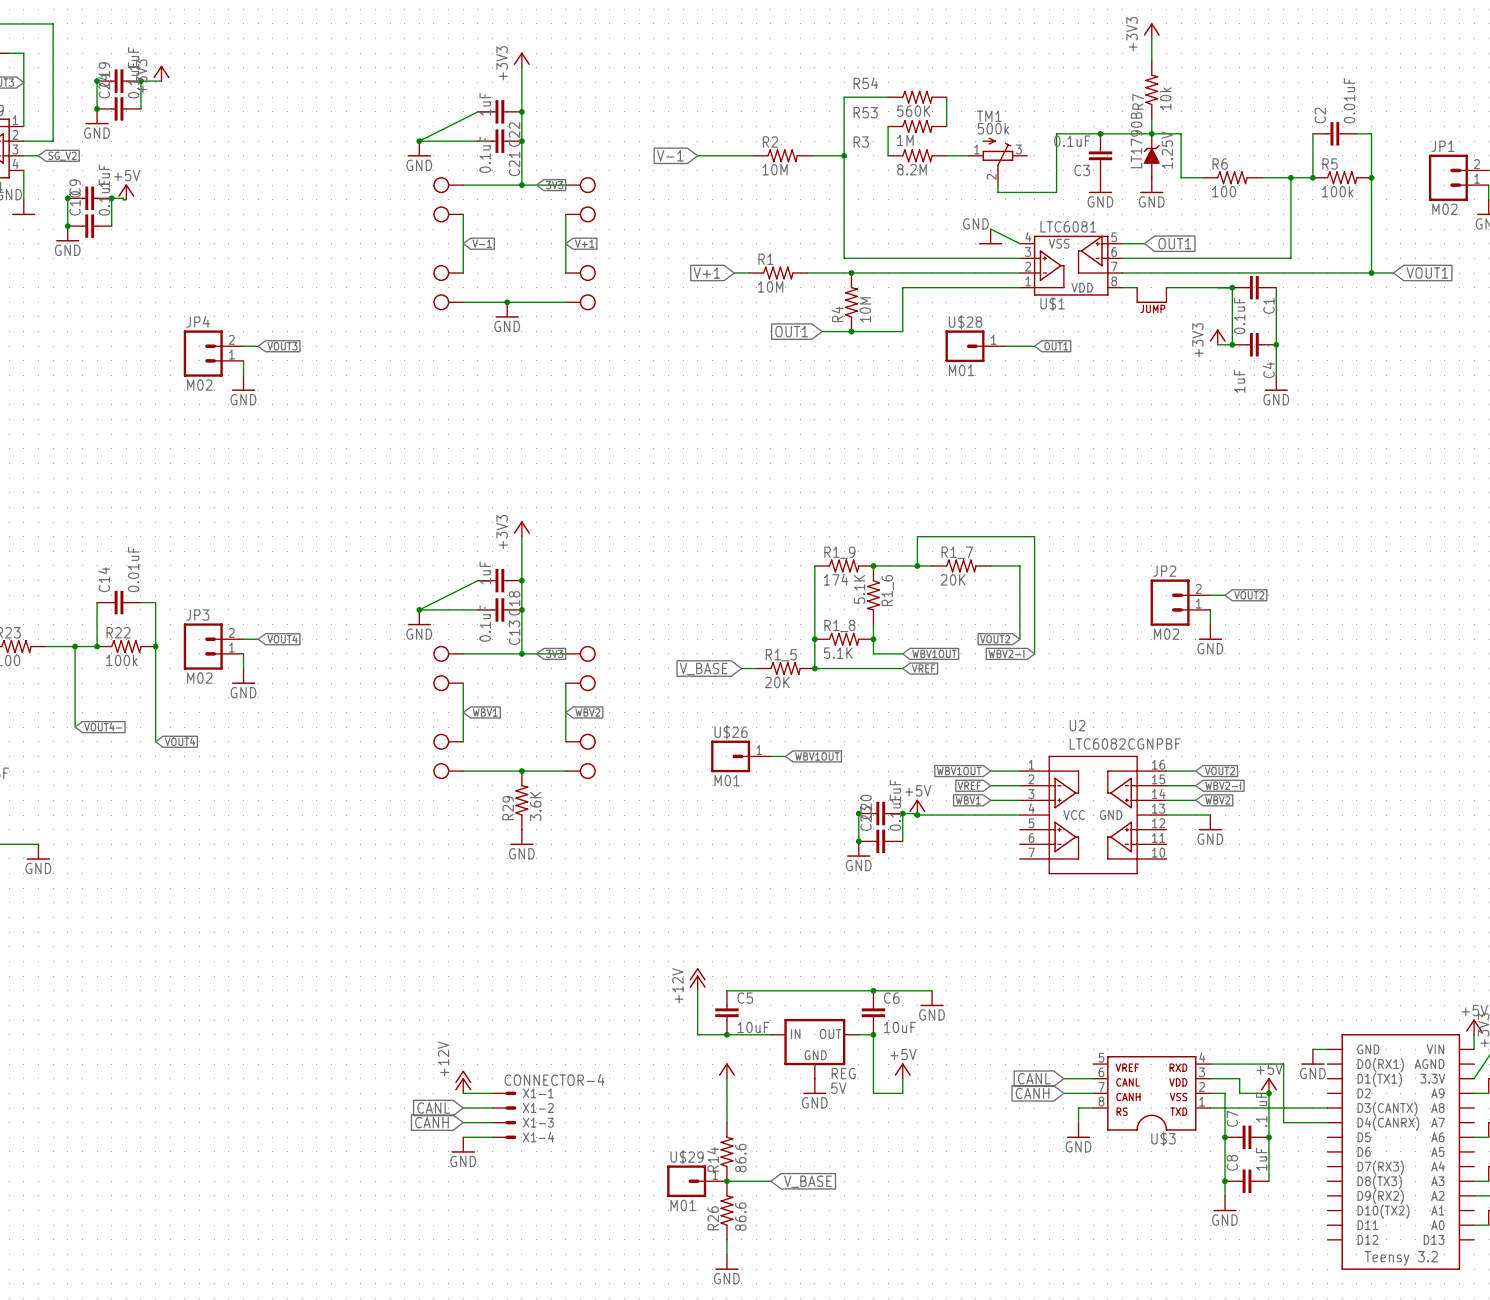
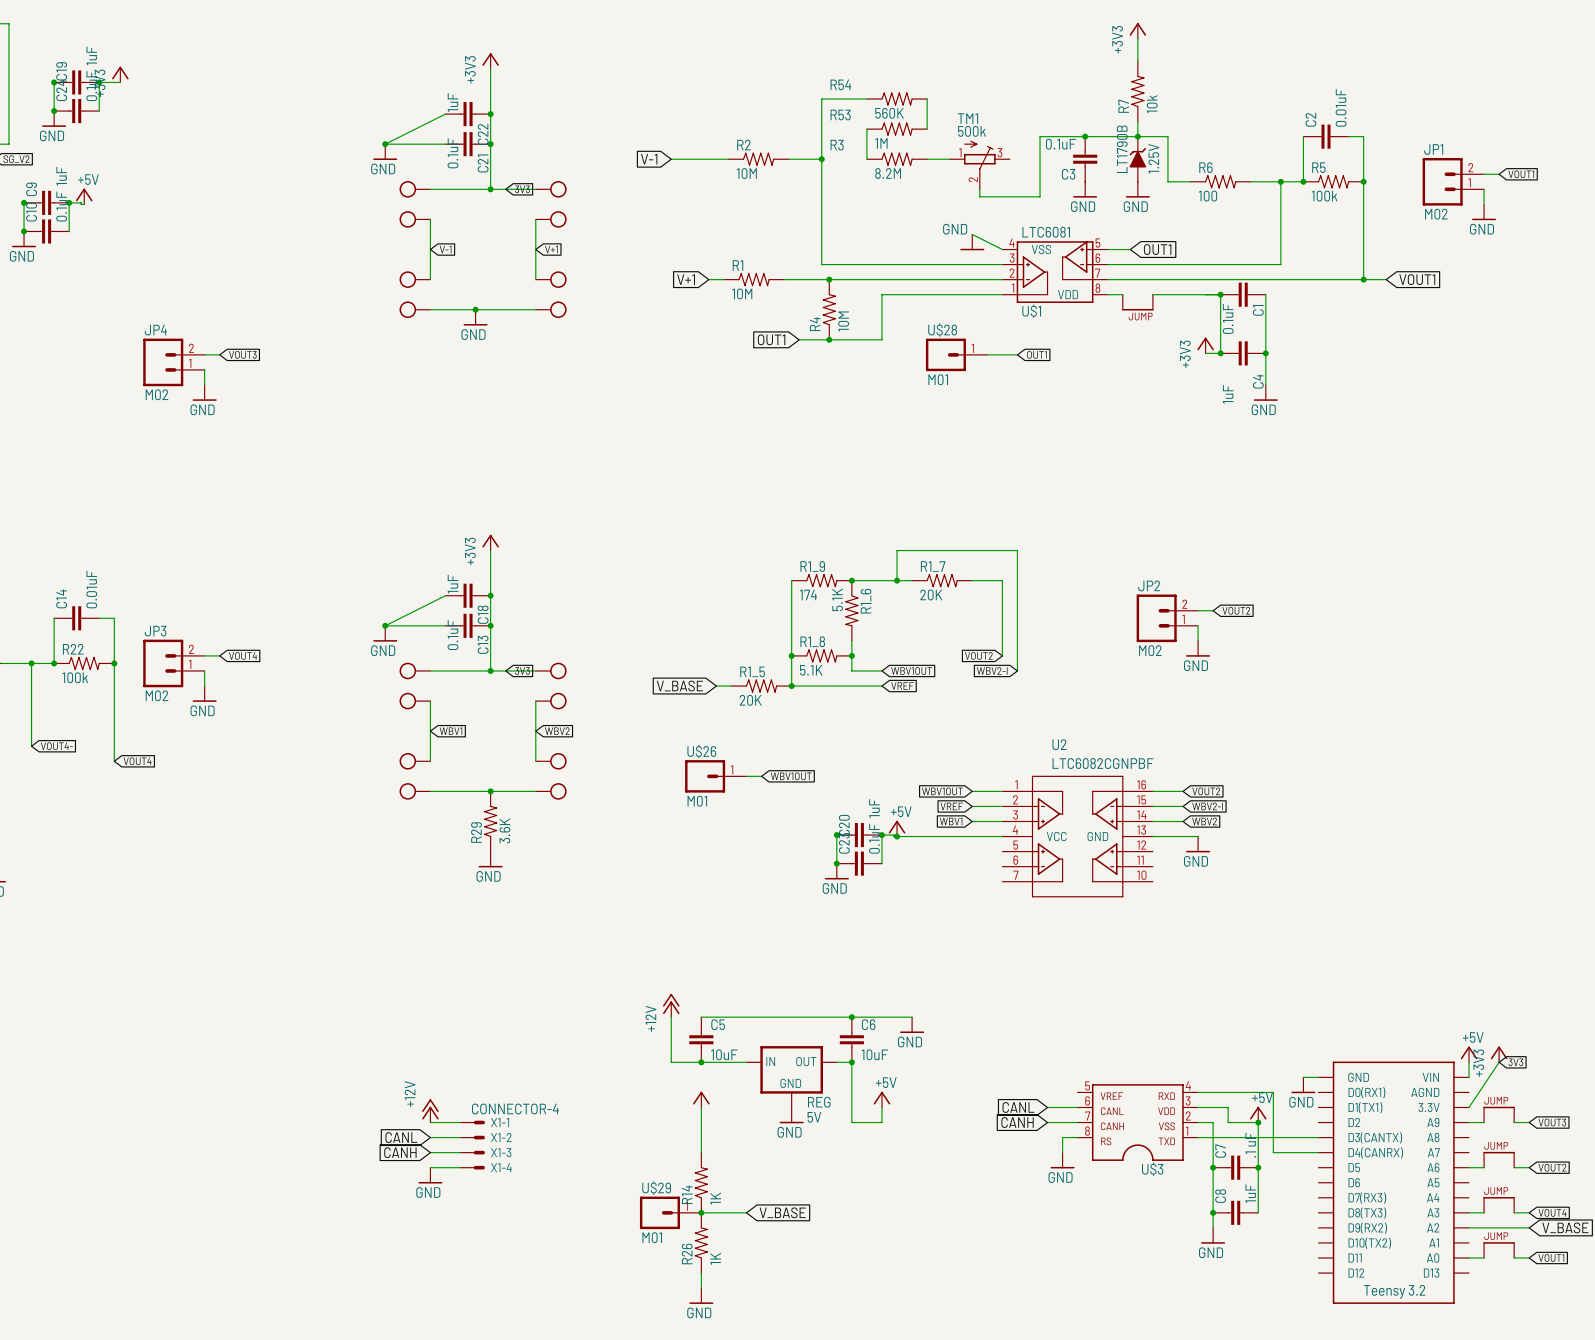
R14 value: 86.6 (740, 1158) -> 1K (715, 1198)
R26 value: 86.6 (740, 1216) -> 1K (715, 1258)

